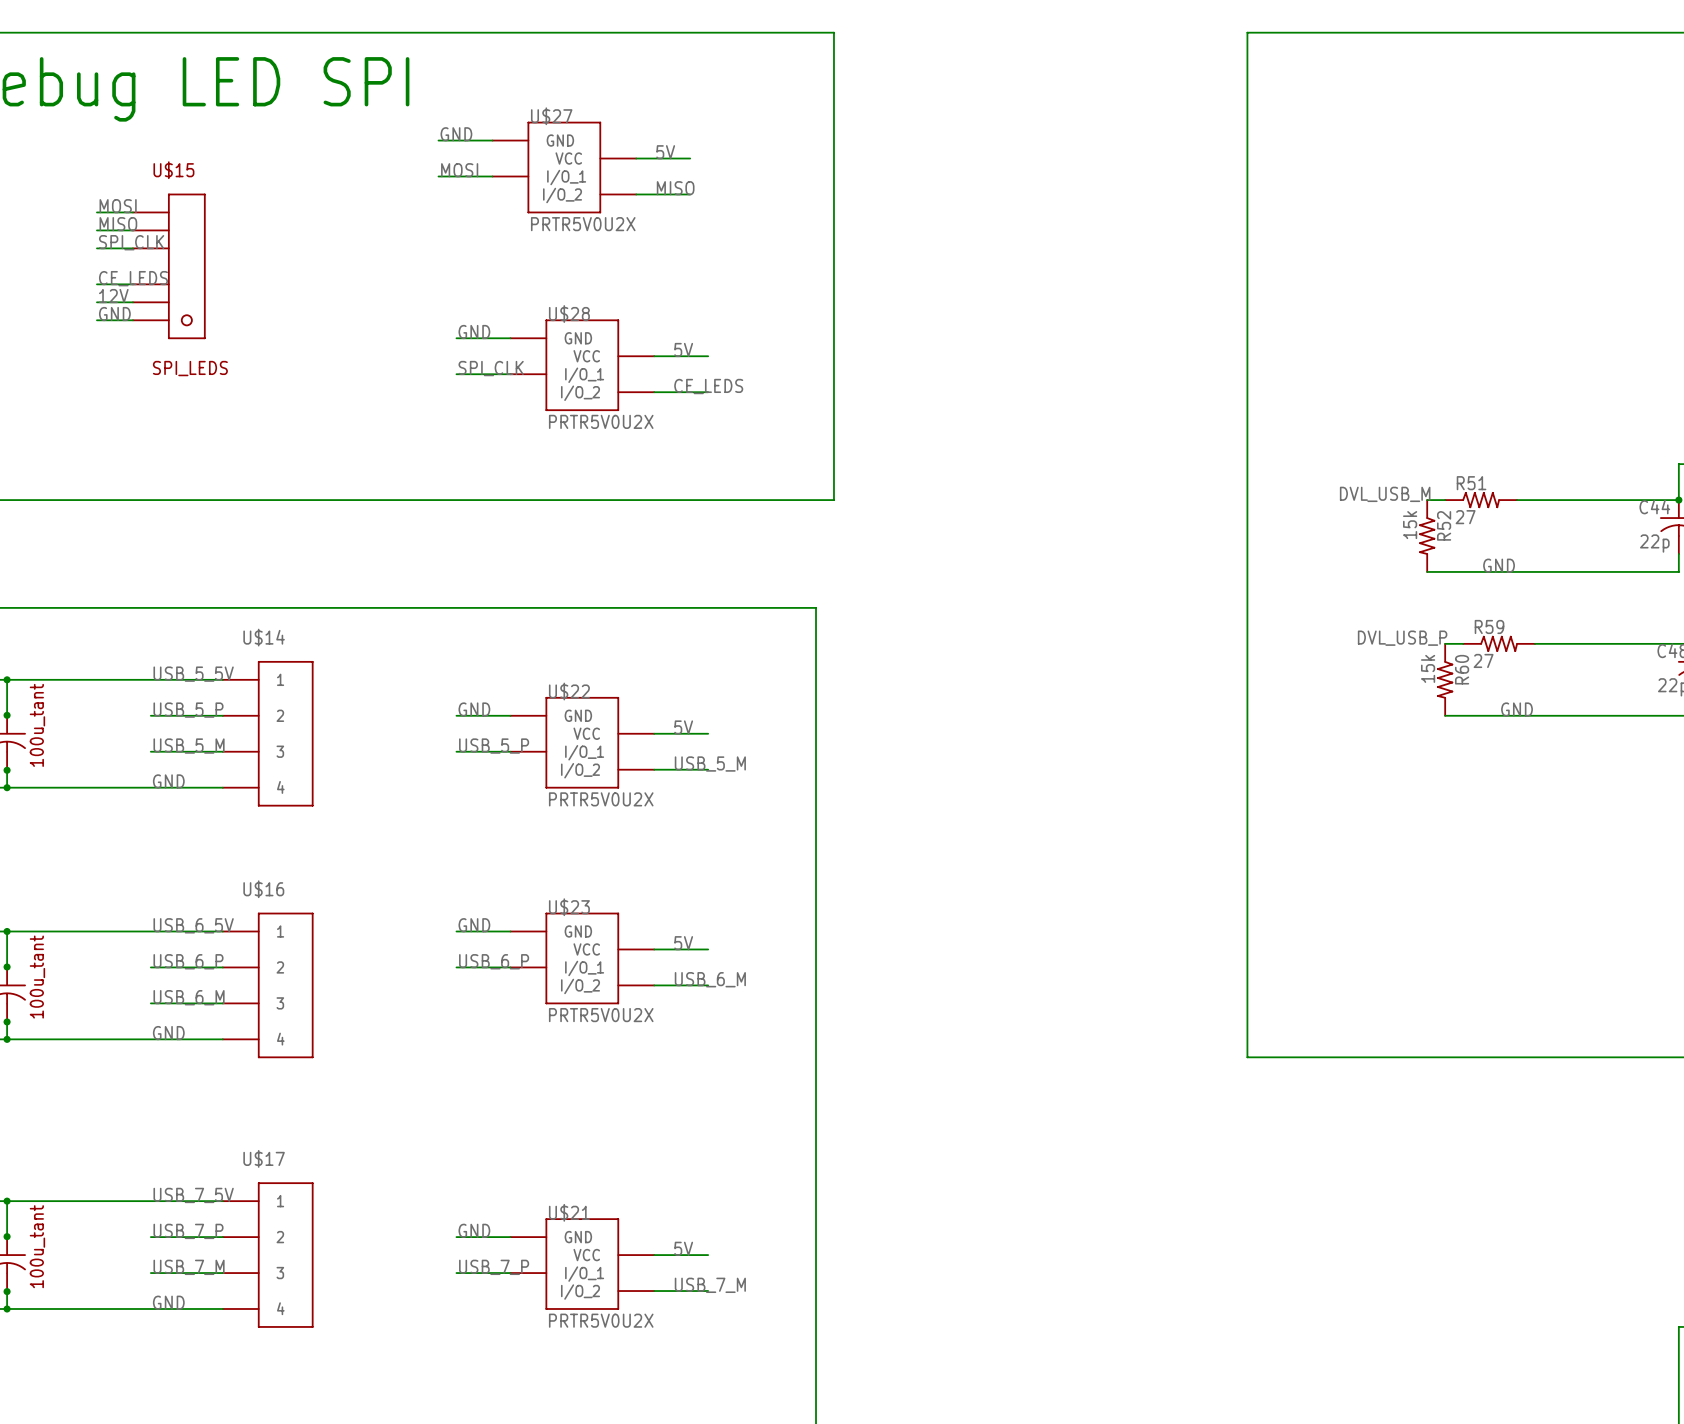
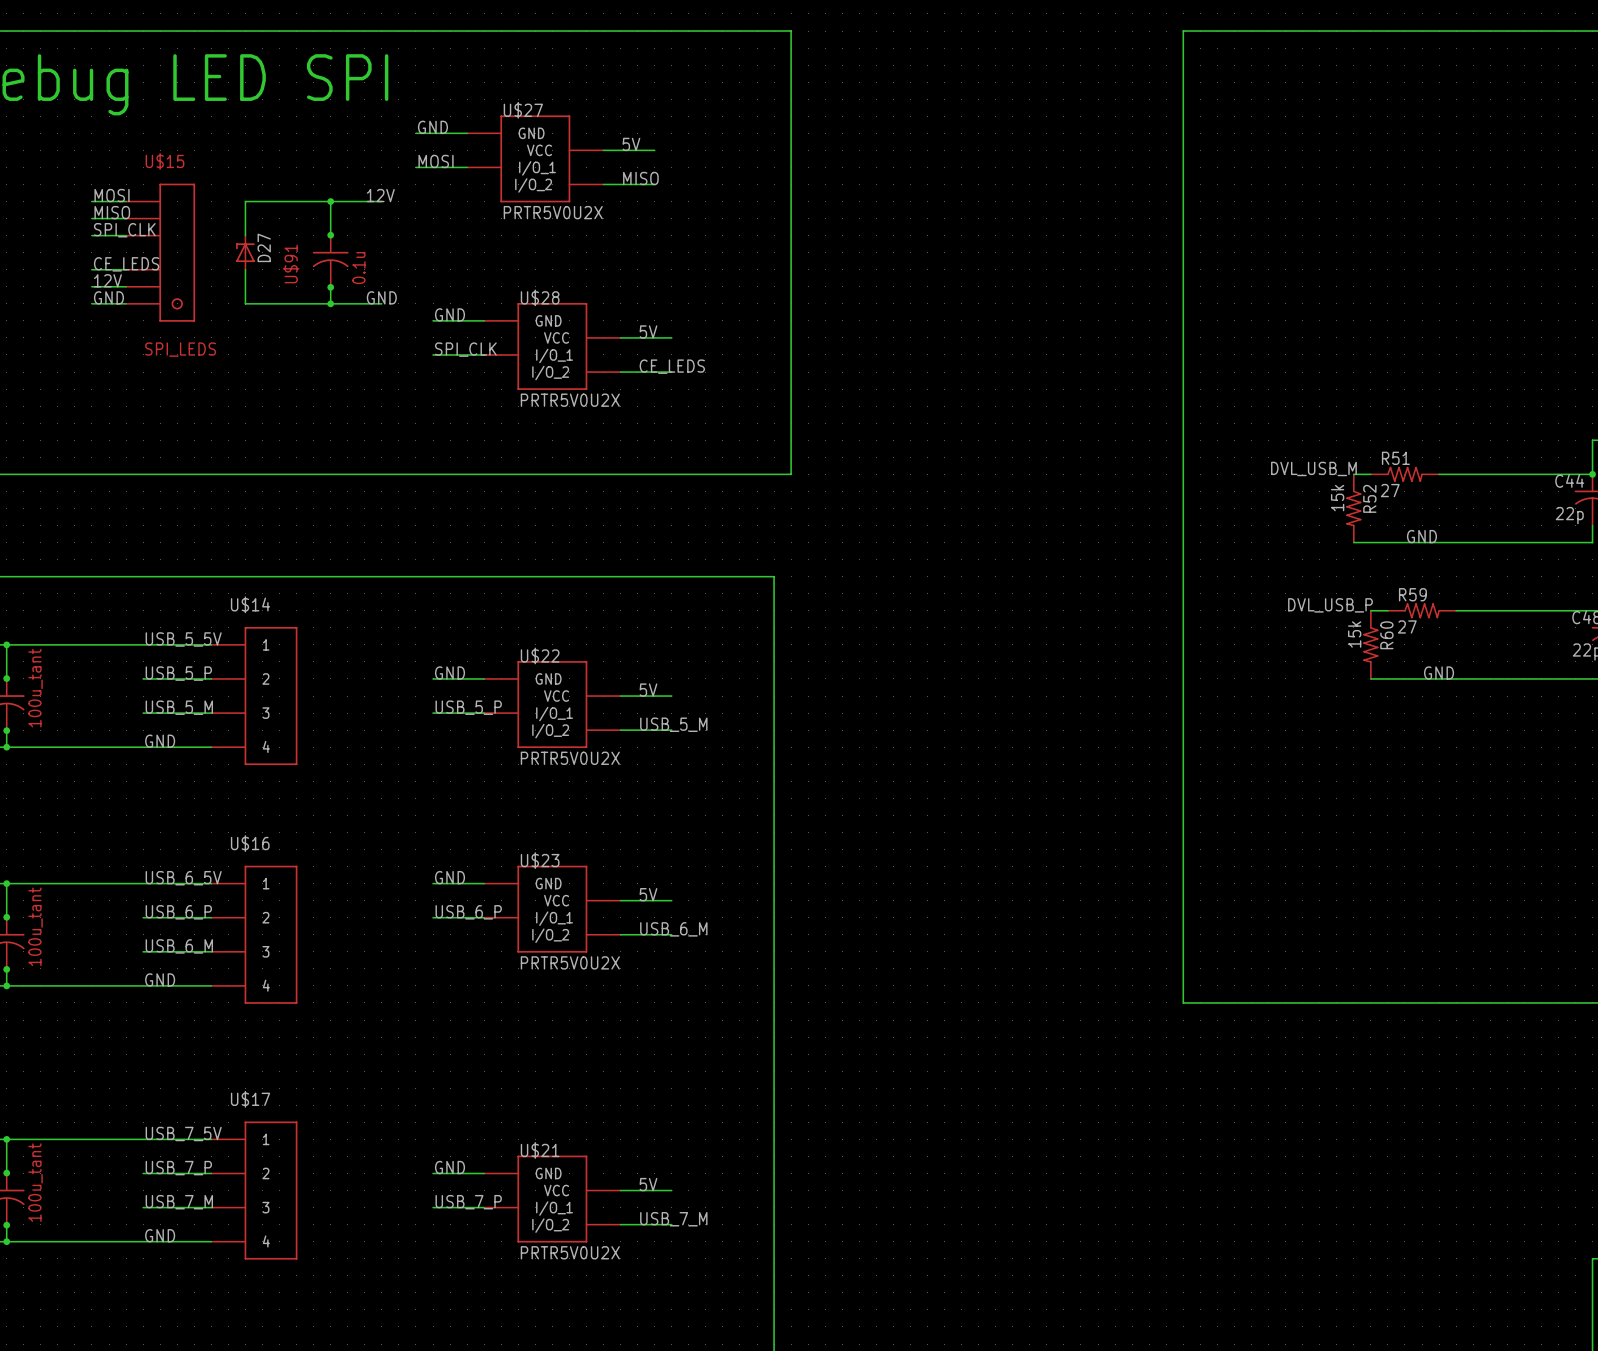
label: none -> 12V (380, 195)
wire: none -> (330, 201) (330, 235)
junction: none -> (330, 201)
wire: none -> (381, 201) (245, 201) (245, 235)
junction: none -> (330, 235)
D27: none -> (245, 252)
U$91: none -> 0.1u (330, 261)
wire: none -> (245, 269) (245, 303) (381, 303)
wire: none -> (330, 286) (330, 303)
junction: none -> (330, 287)
label: none -> GND (381, 297)
junction: none -> (330, 303)

